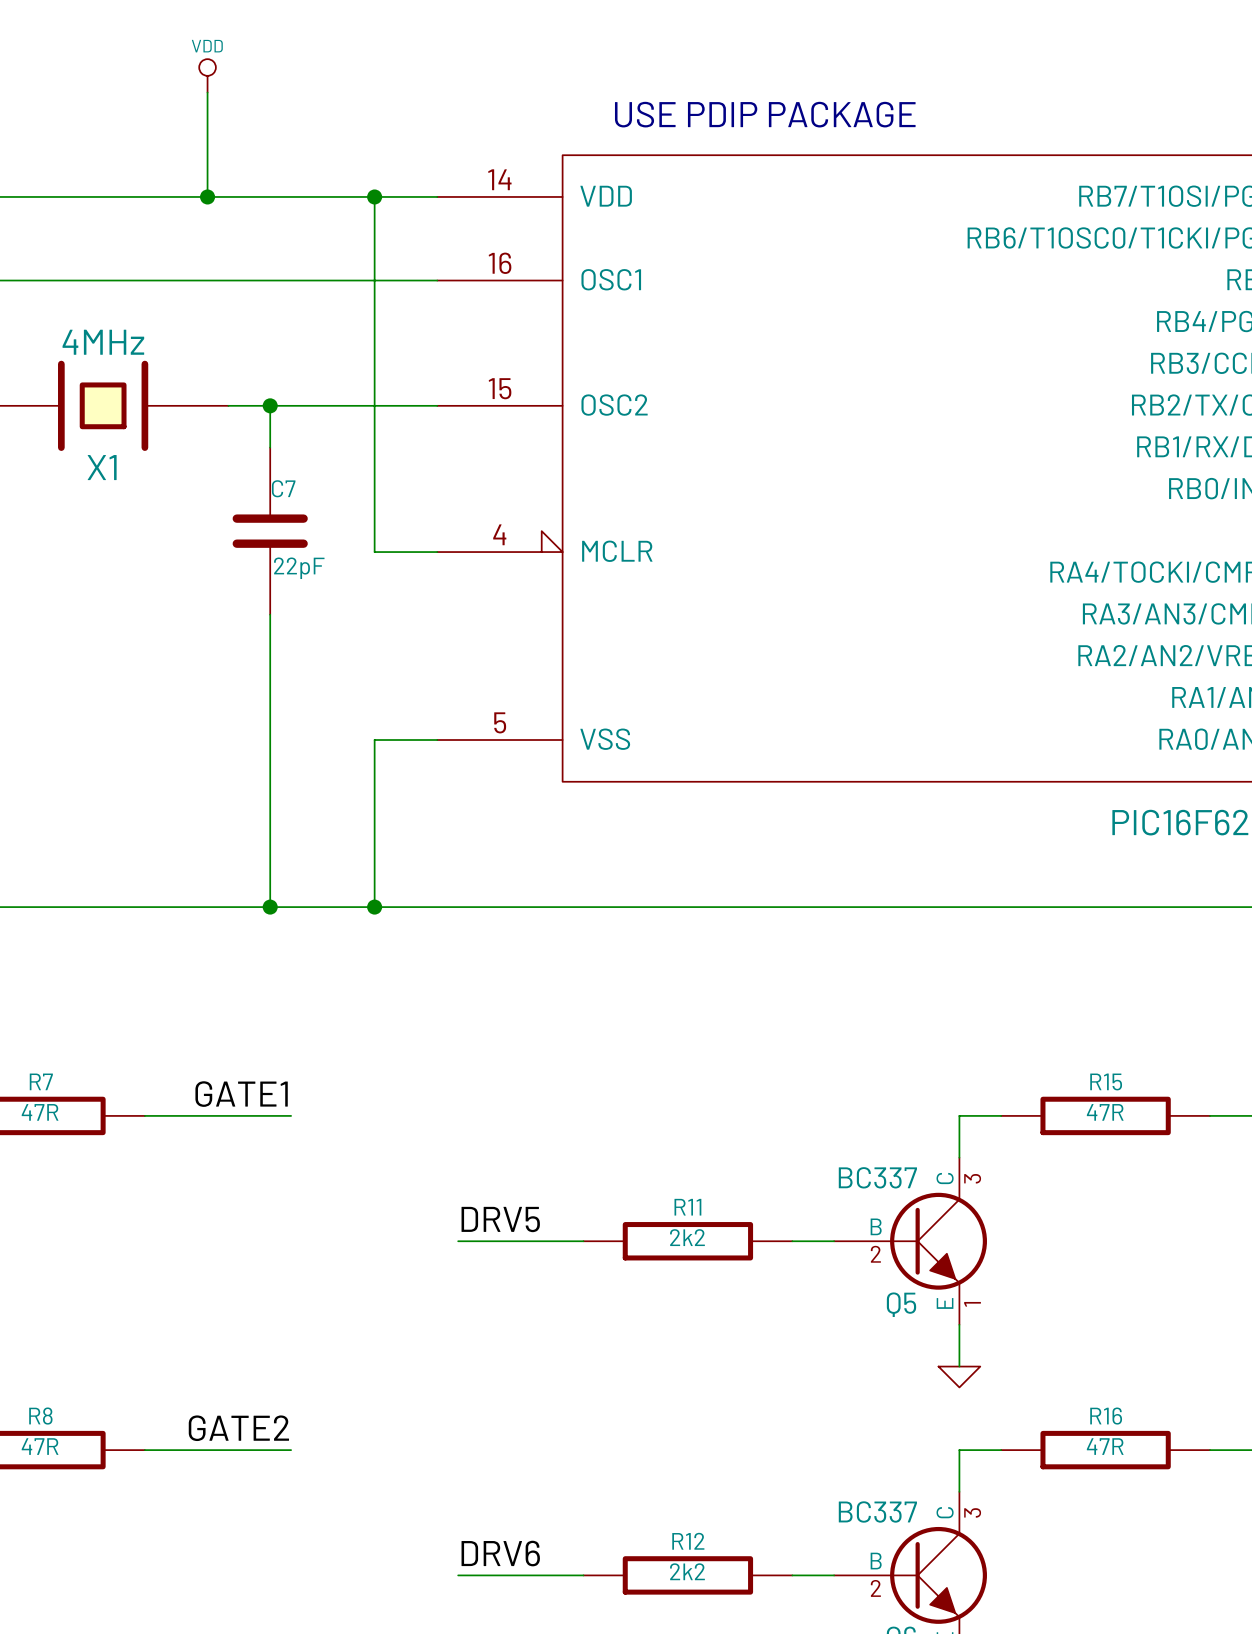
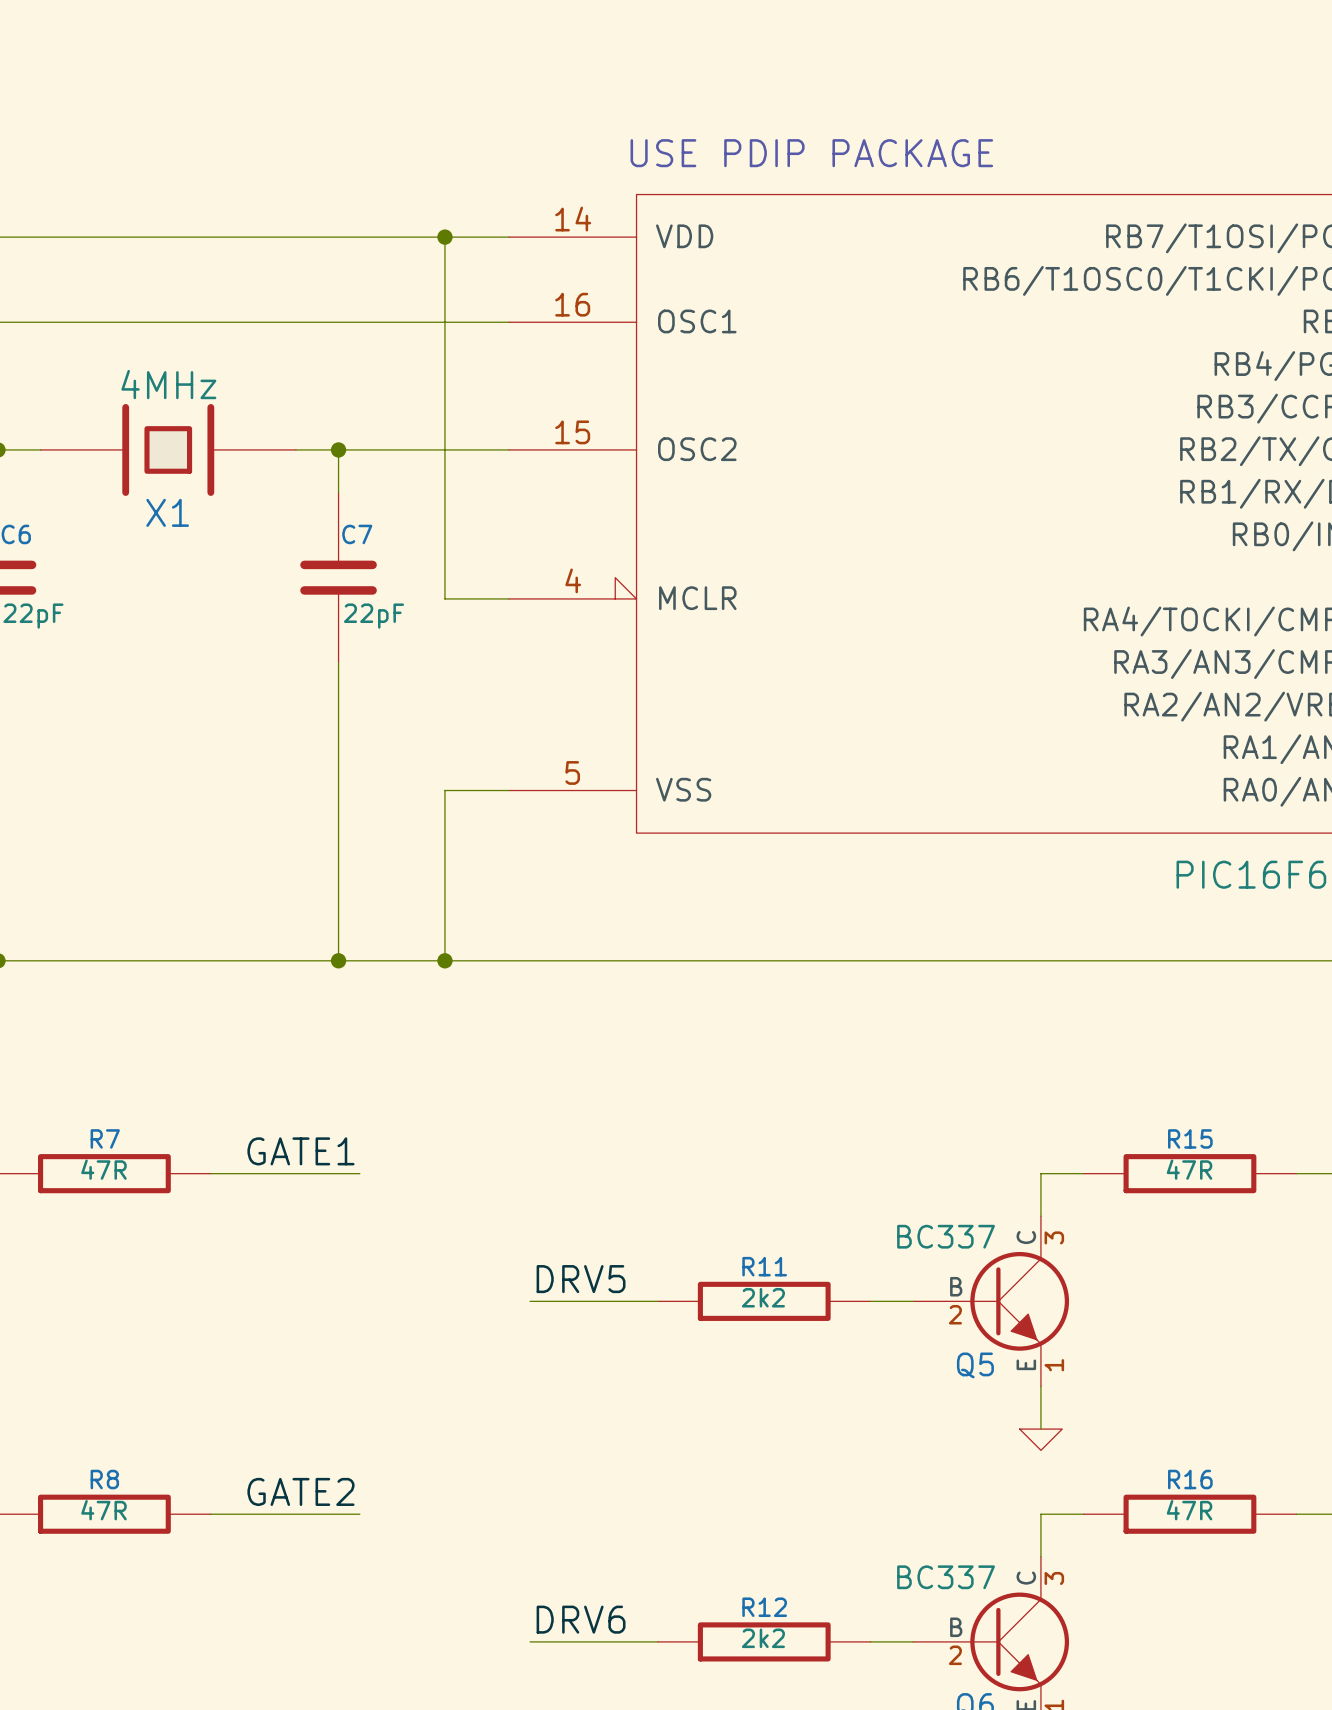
power symbol: VDD (207, 75) -> none
wire: (207, 92) (207, 196) -> none
junction: (207, 196) -> none

